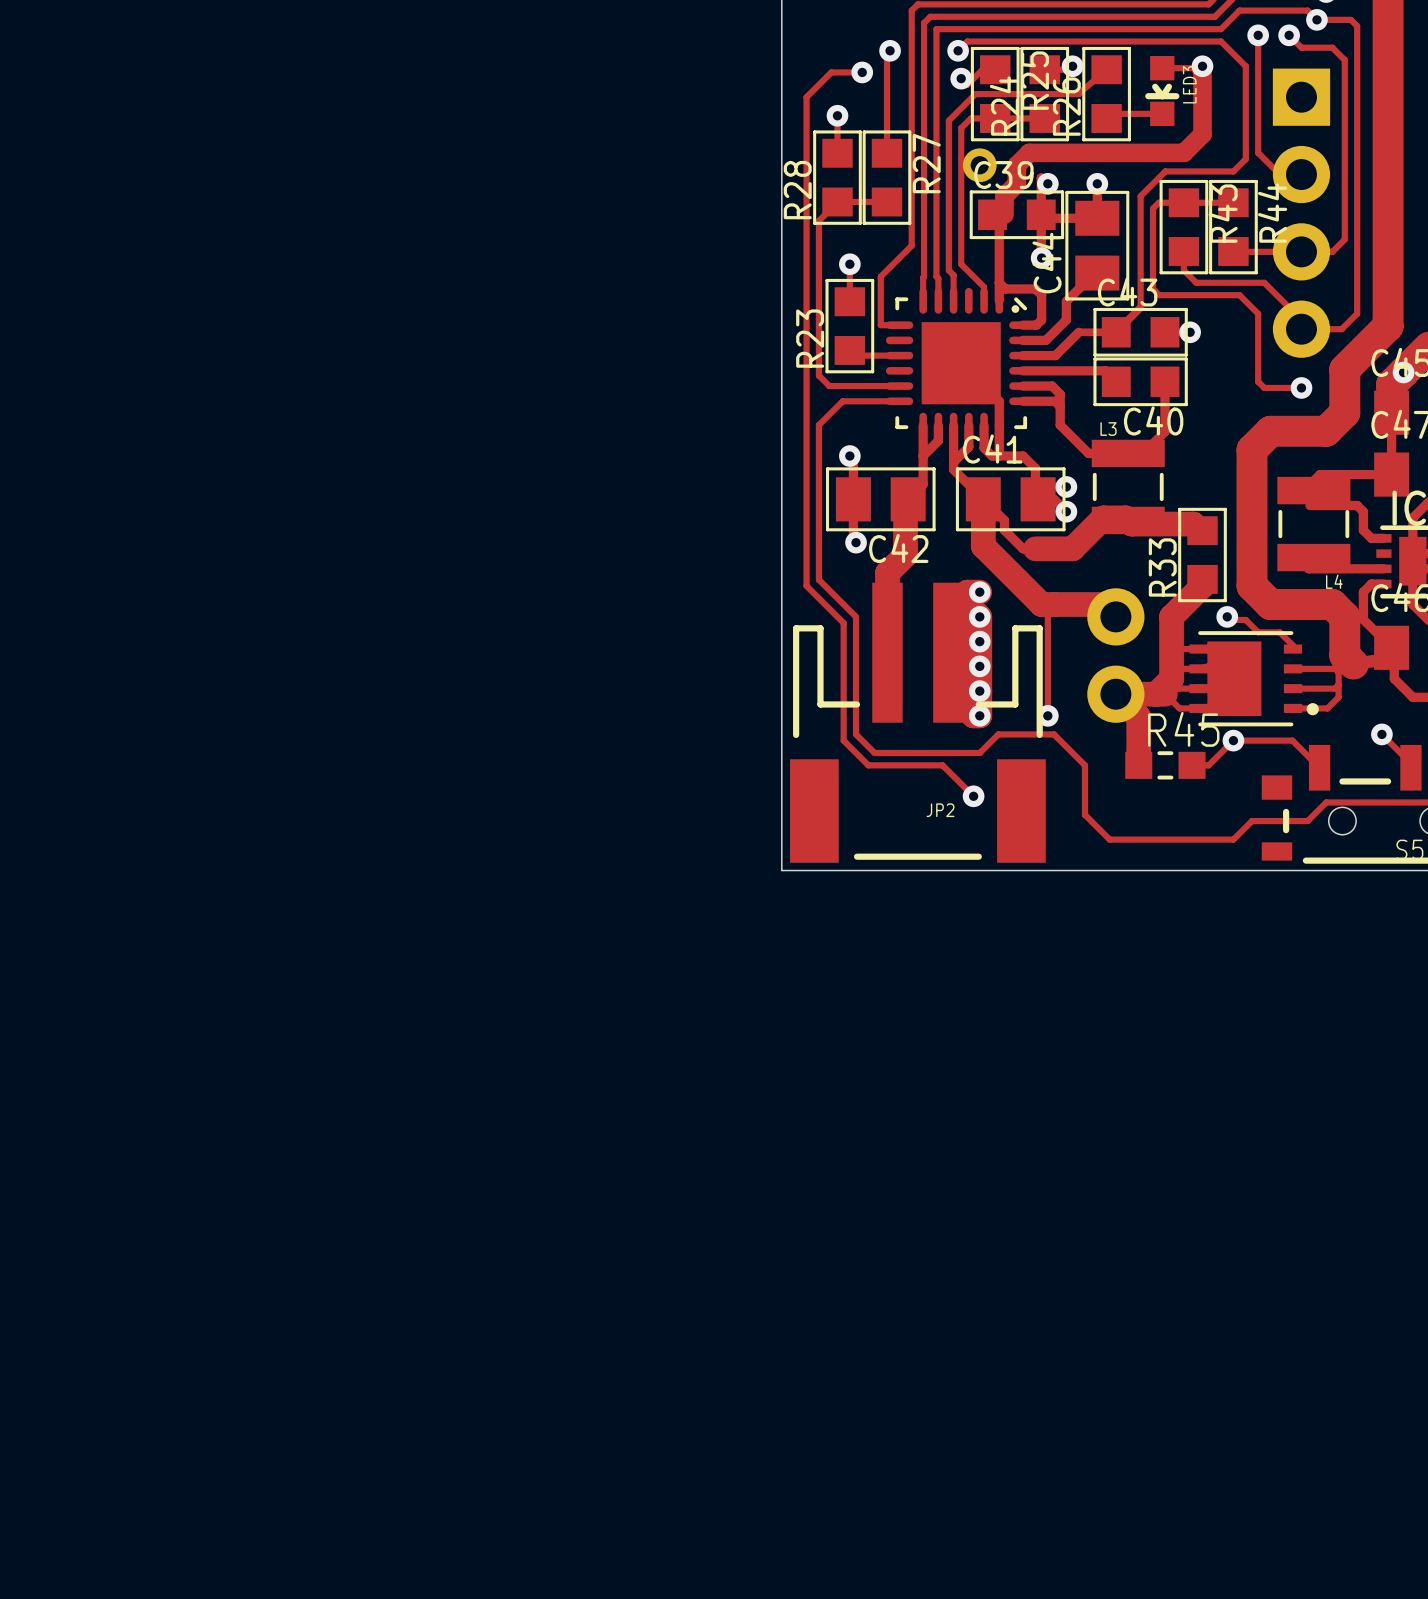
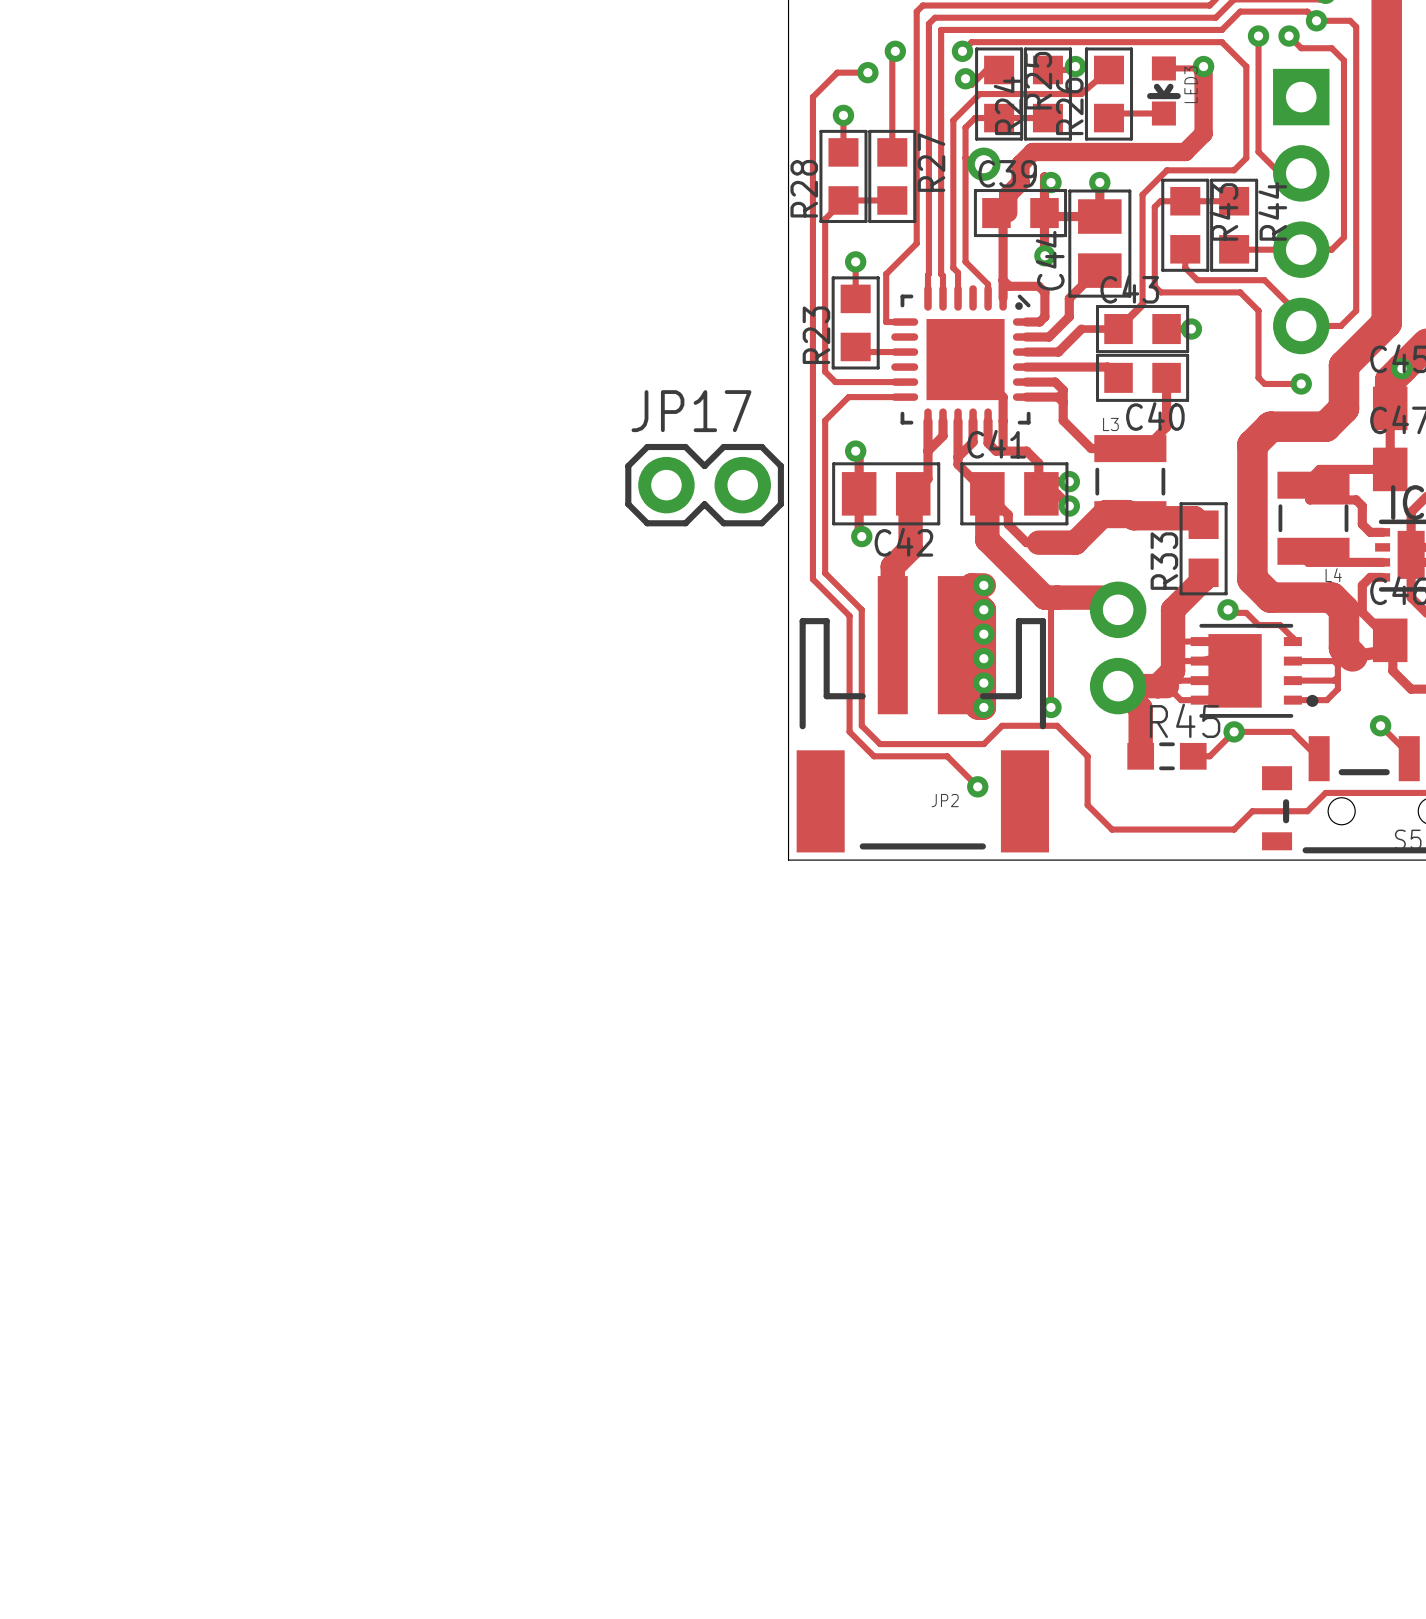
JP17: none -> (704, 485)

